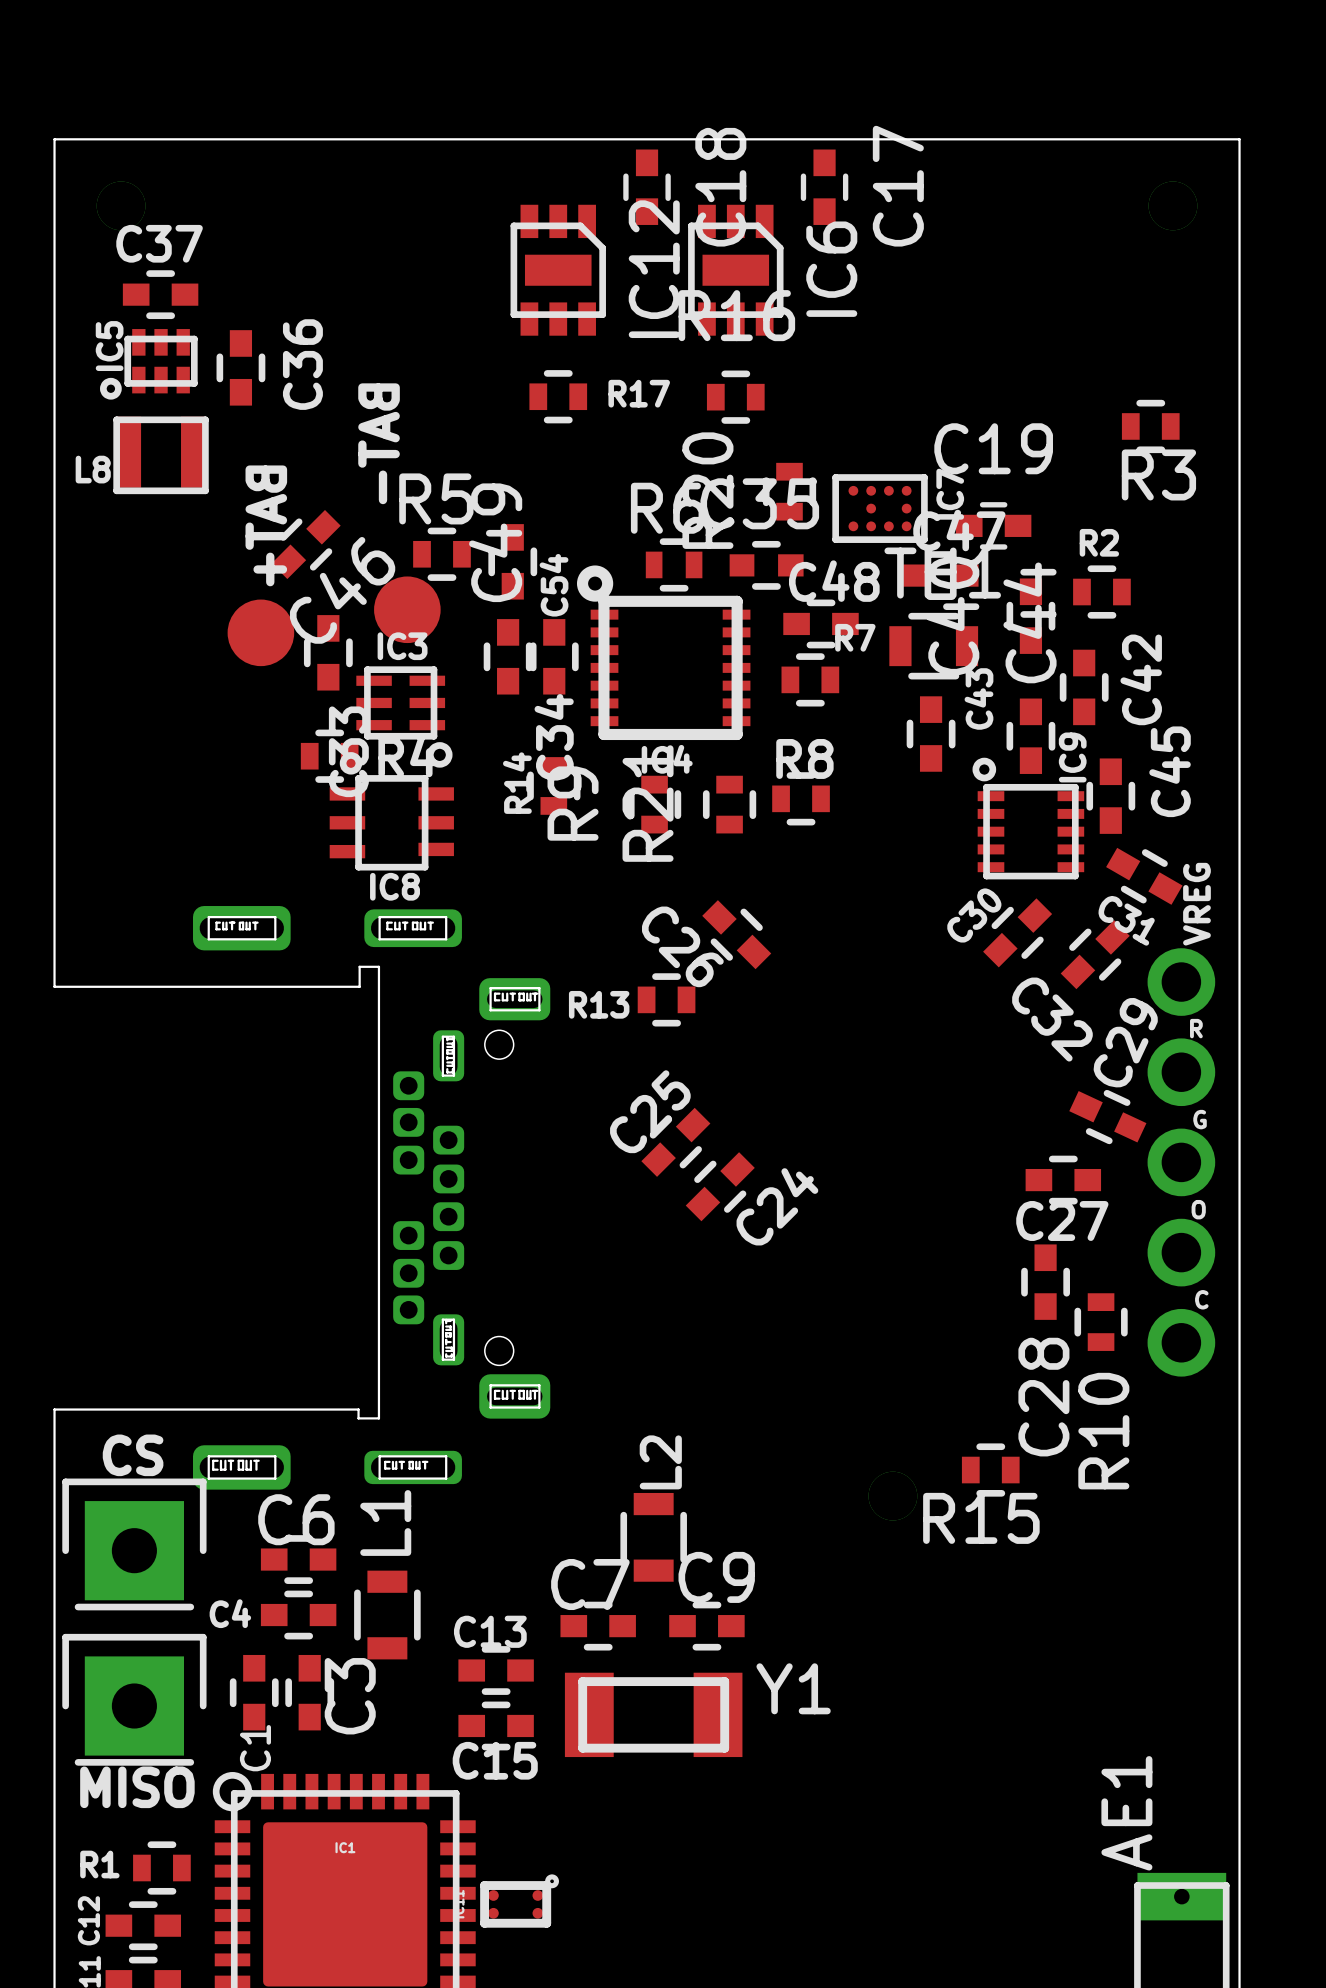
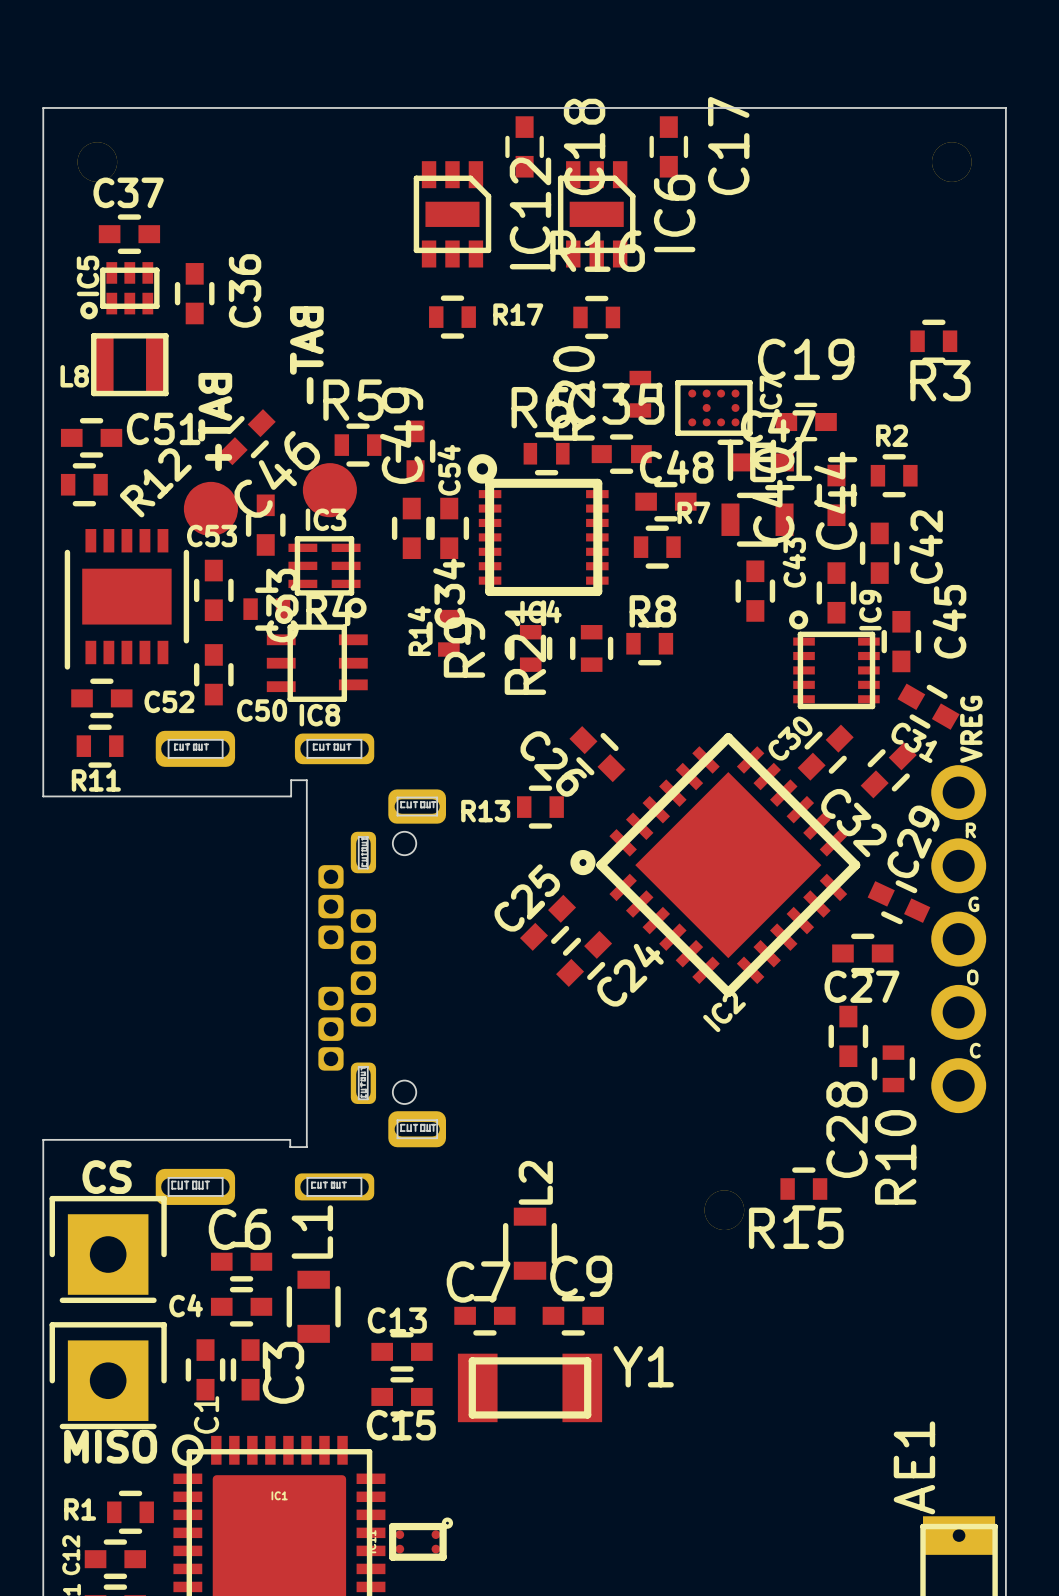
C51: none -> (91, 437)
R12: none -> (84, 484)
C53: none -> (213, 590)
part: none -> (126, 599)
C50: none -> (213, 674)
C52: none -> (101, 698)
R11: none -> (100, 746)
IC2: none -> (715, 865)

